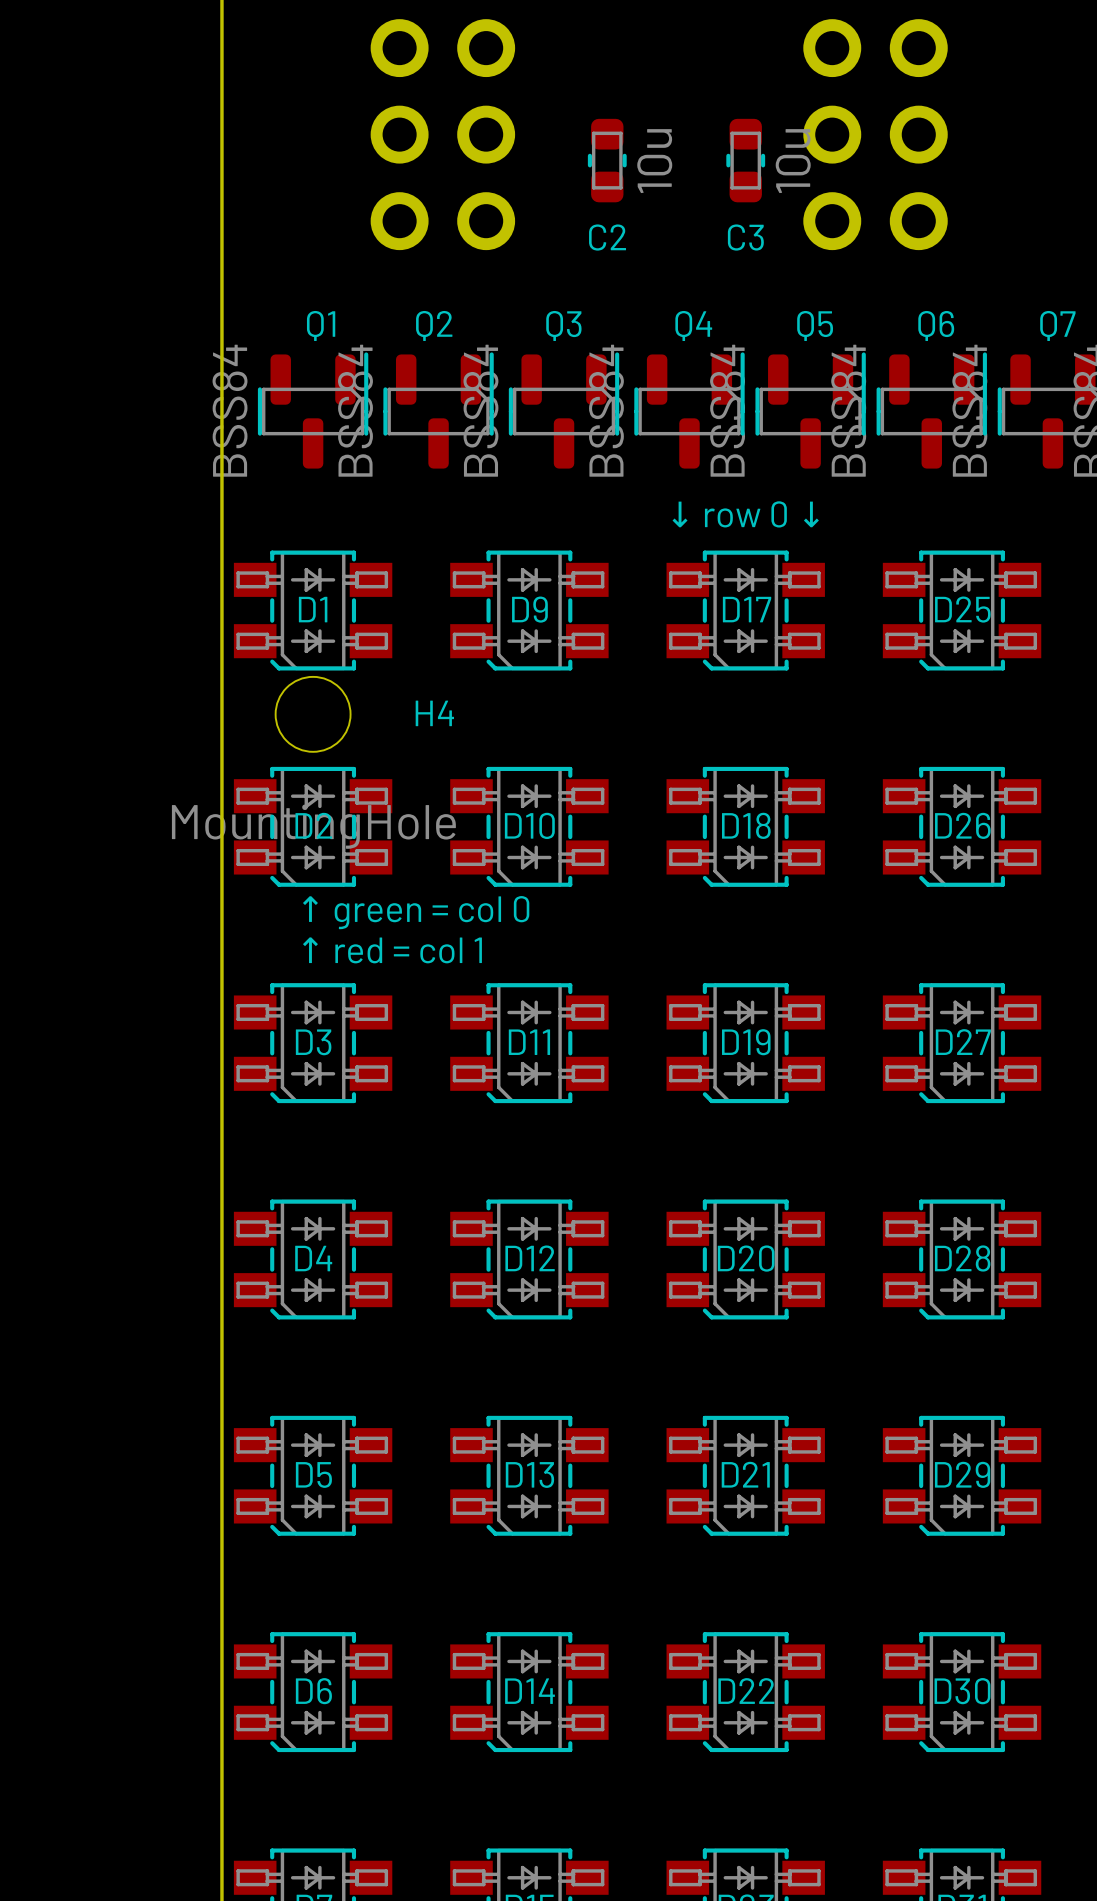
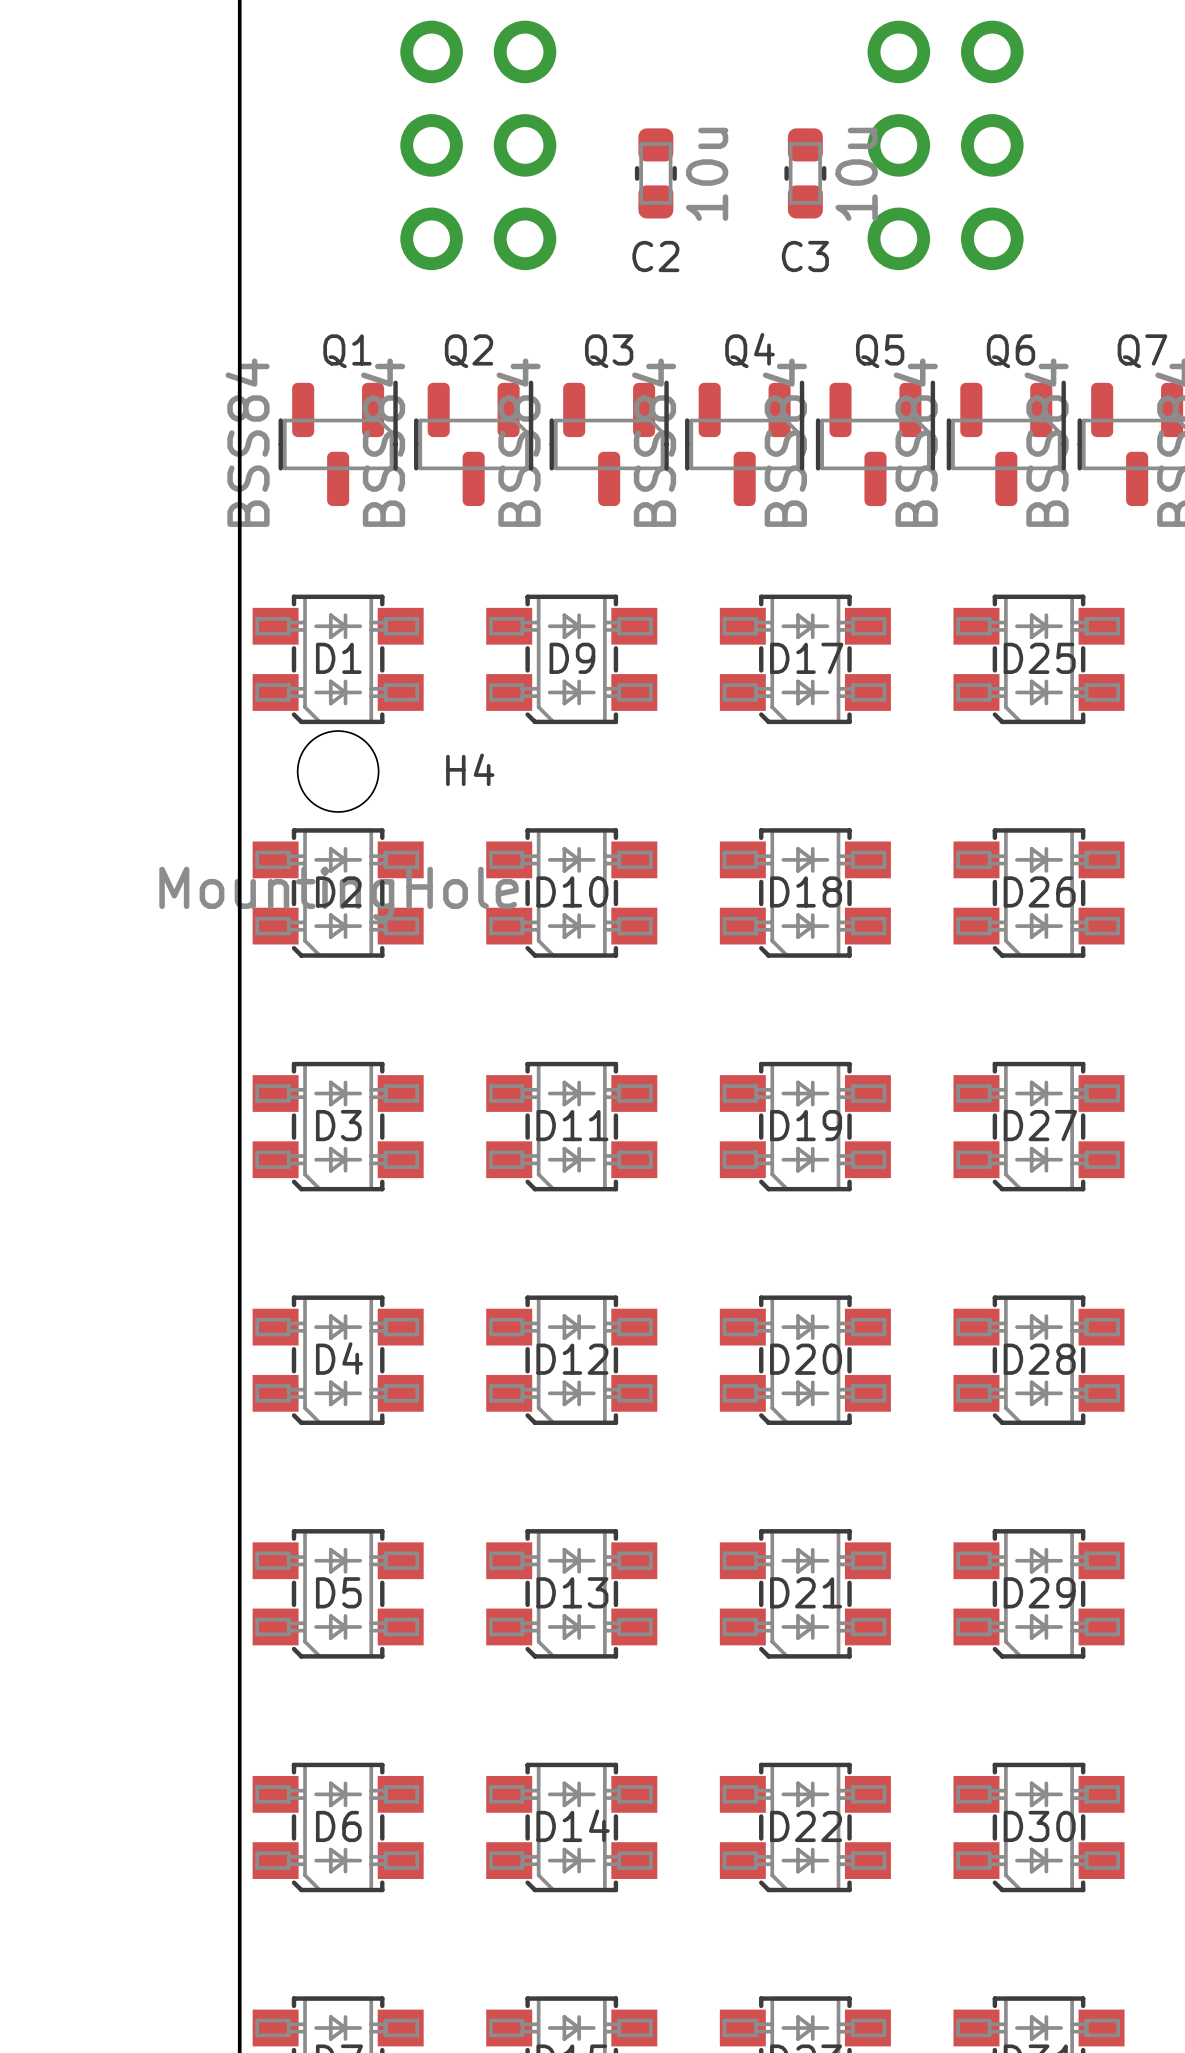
text: ↓ row 0 ↓ (745, 514) -> none
text: ↑ green = col 0 (416, 912) -> none
text: ↑ red = col 1 (392, 950) -> none

